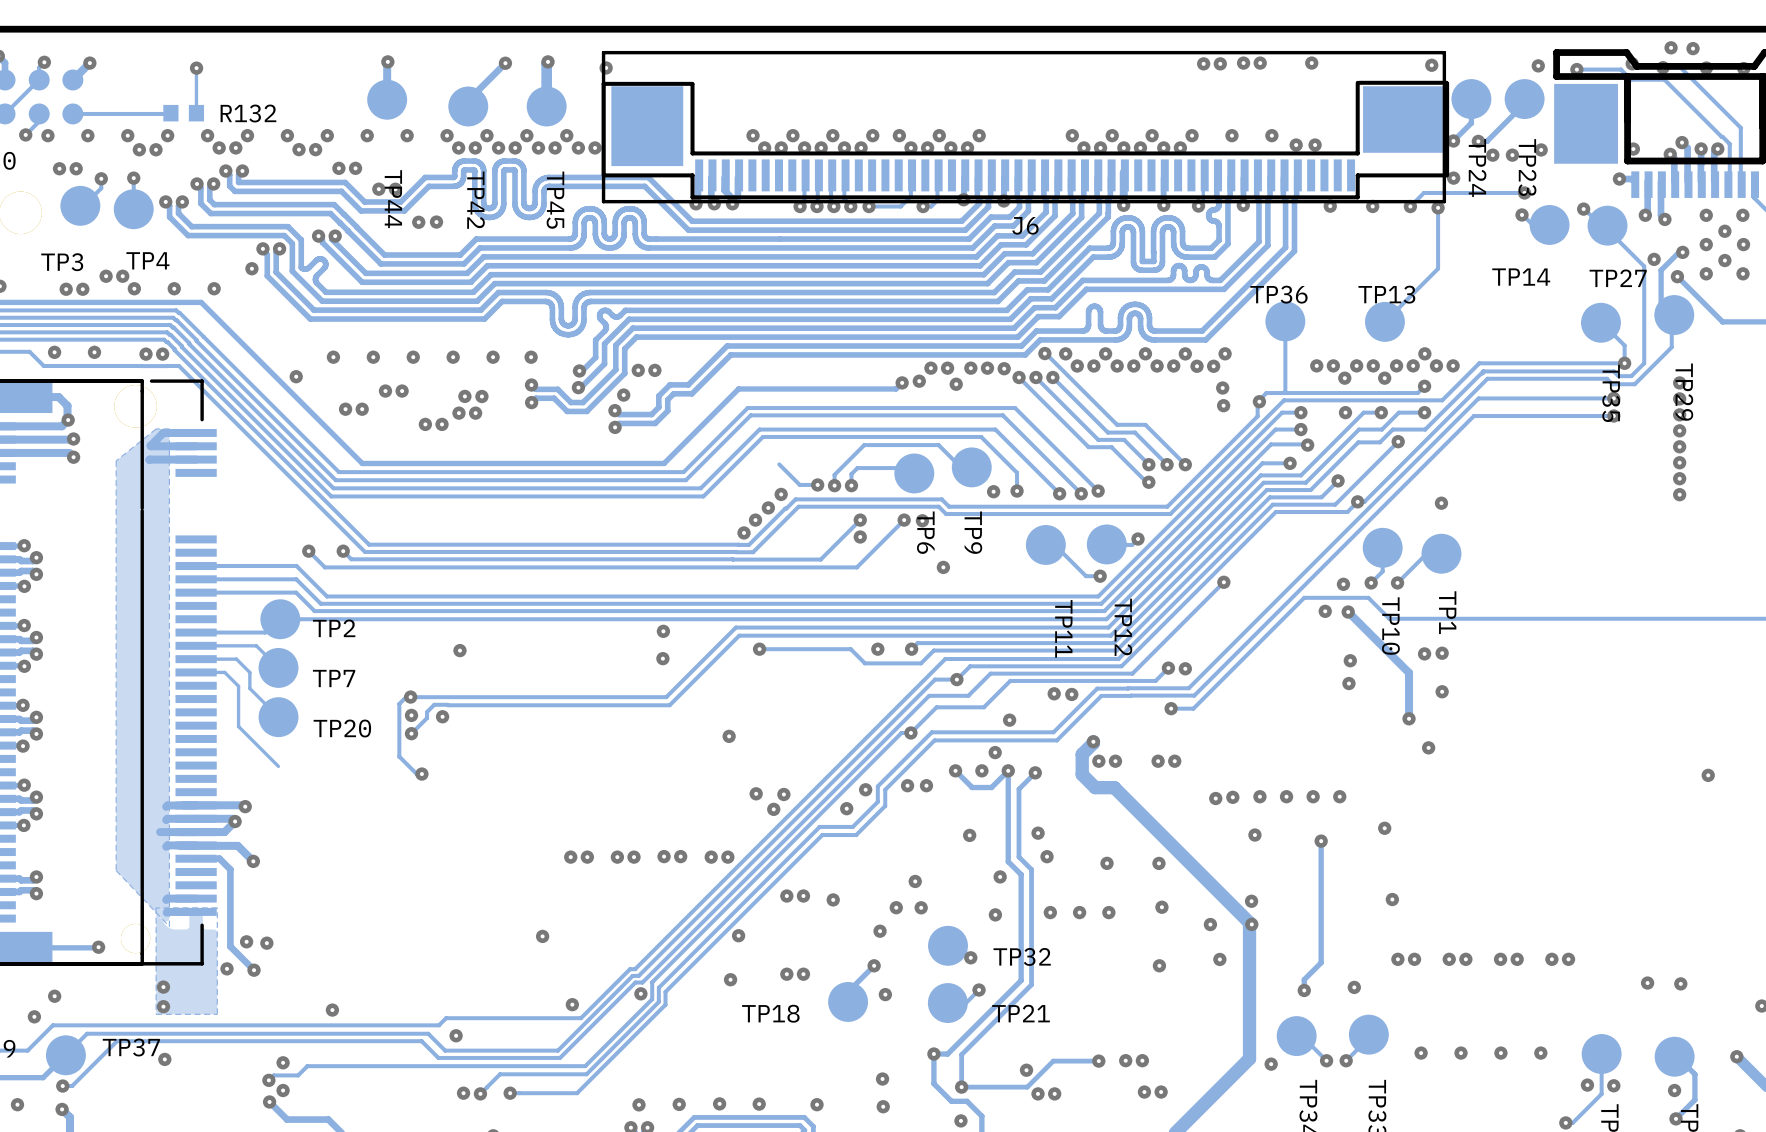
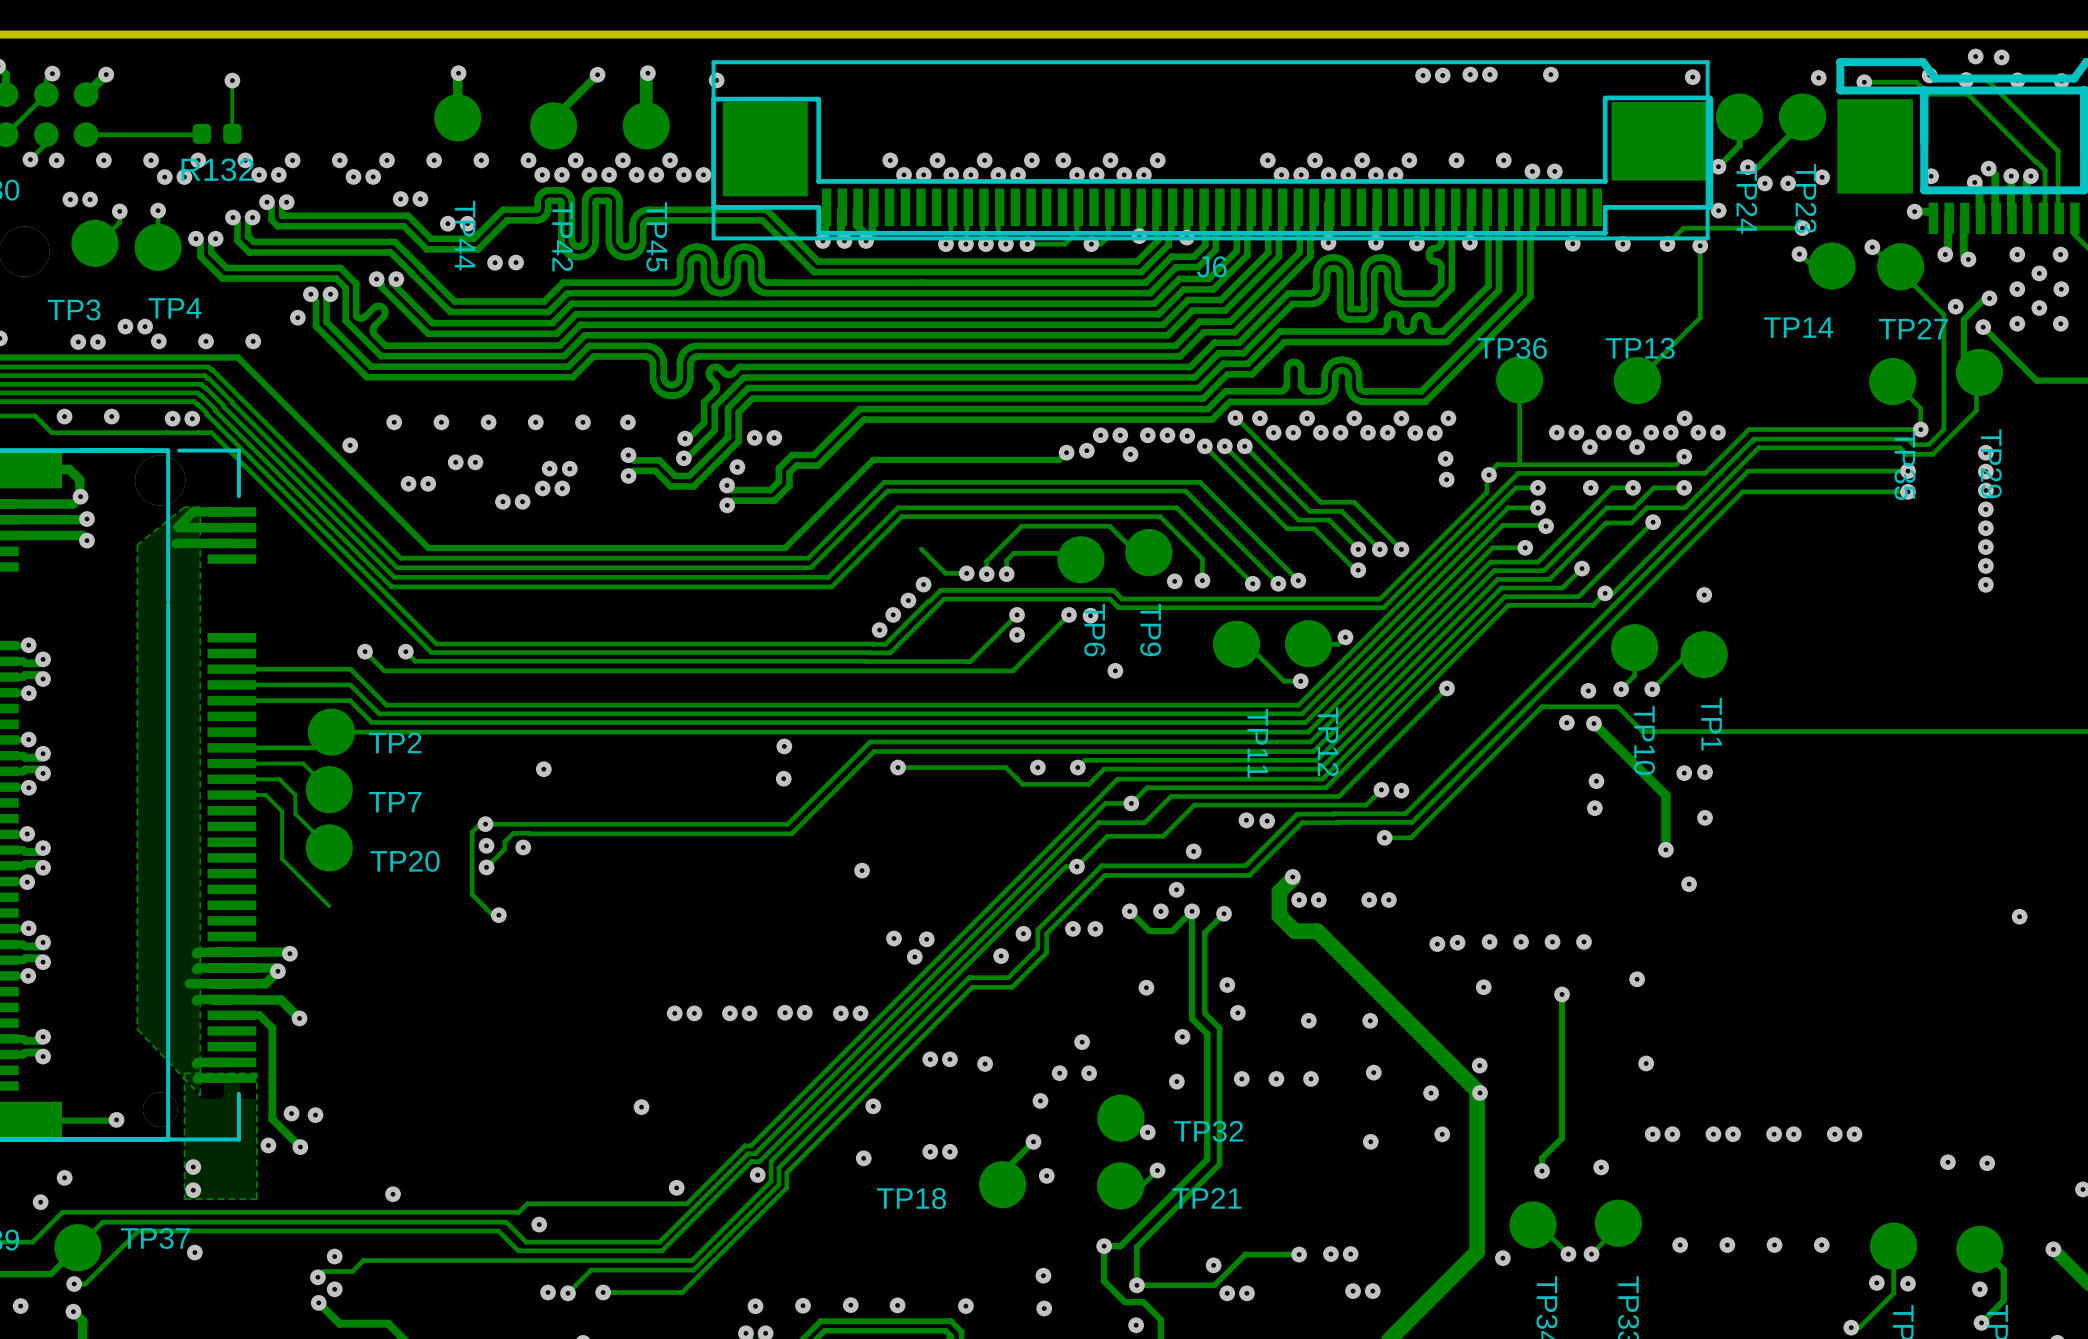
R132 footprint: [163, 104, 205, 122] -> [192, 123, 242, 144]
R132 name position: R132 (248, 113) -> R132 (217, 169)

